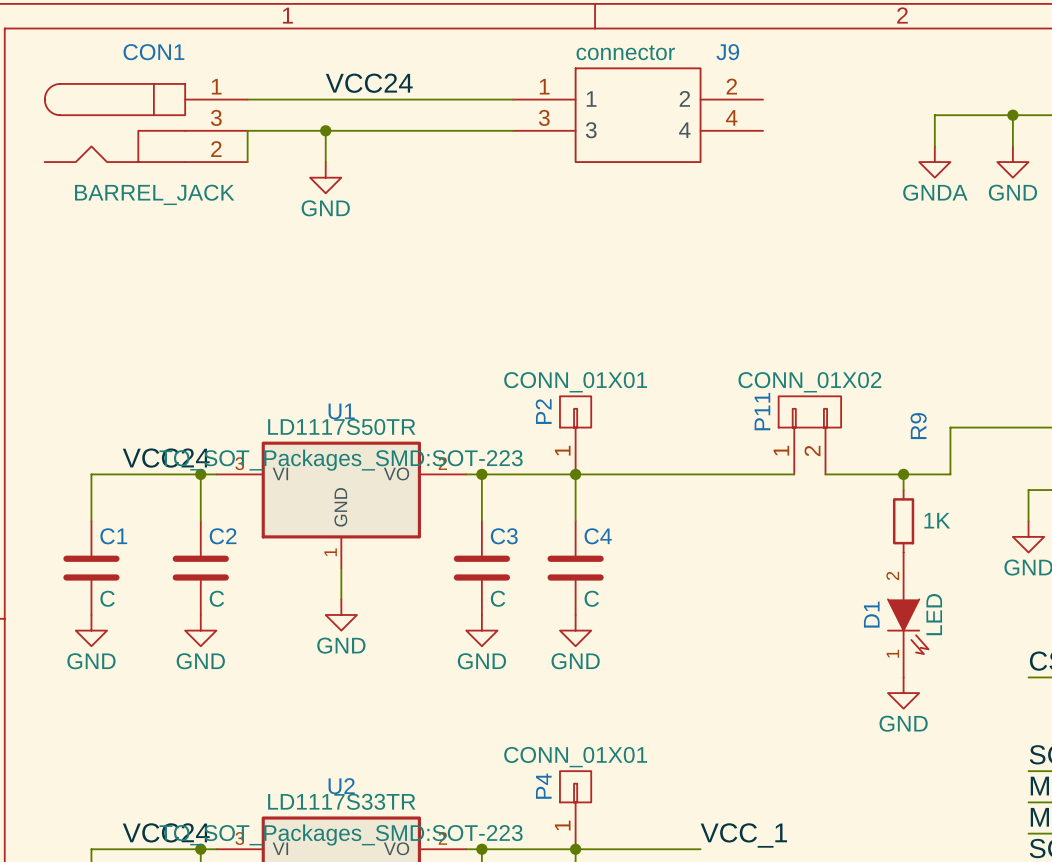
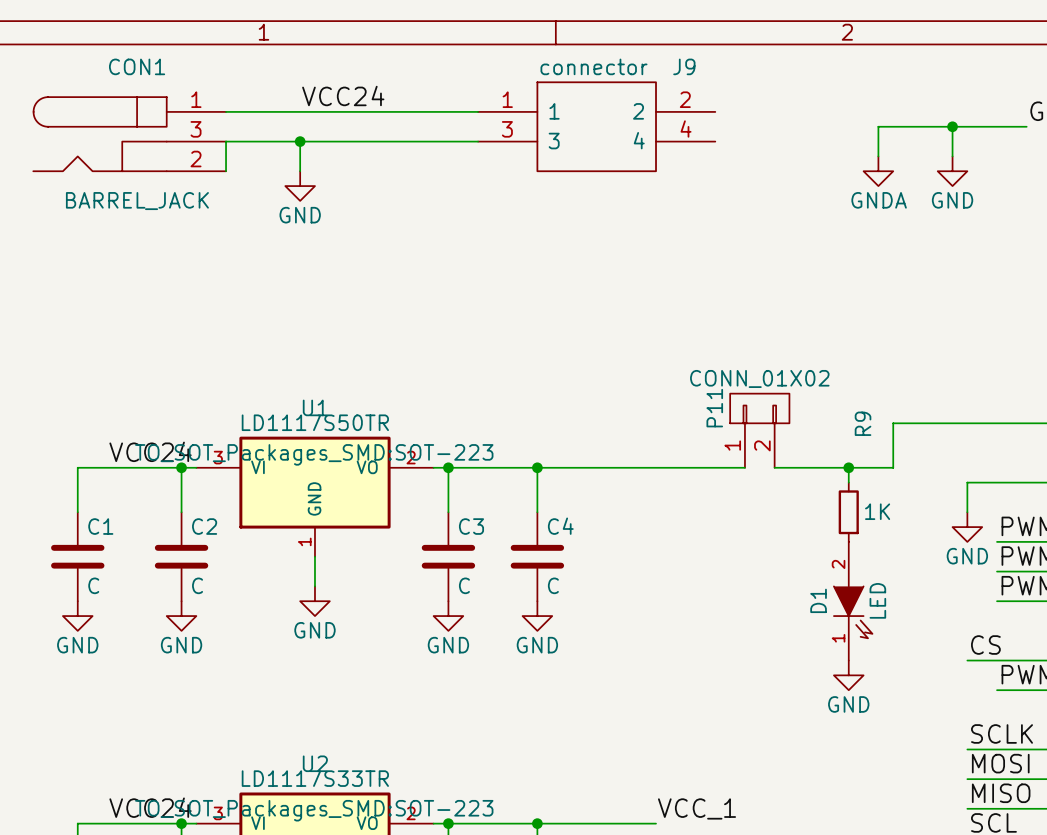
P2: CONN_01X01 (575, 435) -> none
P4: CONN_01X01 (575, 810) -> none

